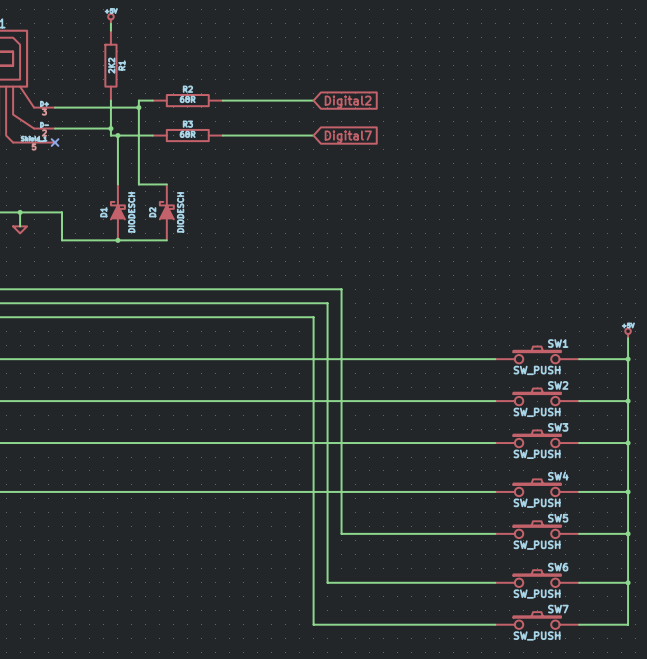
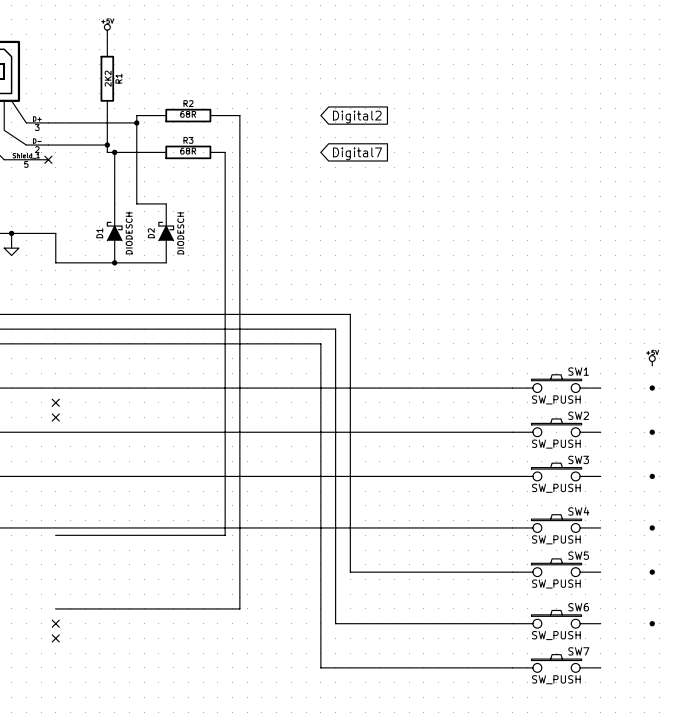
wire: (236, 100) (313, 100) -> (239, 115) (239, 608) (55, 608)
wire: (222, 135) (313, 135) -> (225, 152) (225, 535) (55, 535)
wire: (628, 338) (628, 624) (579, 624) -> none
wire: (579, 359) (628, 359) -> none
no-connect mark: none -> (55, 402)
no-connect mark: none -> (55, 417)
wire: (579, 401) (628, 401) -> none
wire: (579, 443) (628, 443) -> none
wire: (579, 491) (628, 491) -> none
wire: (579, 533) (628, 533) -> none
no-connect mark: none -> (55, 623)
wire: (579, 582) (628, 582) -> none
no-connect mark: none -> (55, 638)

